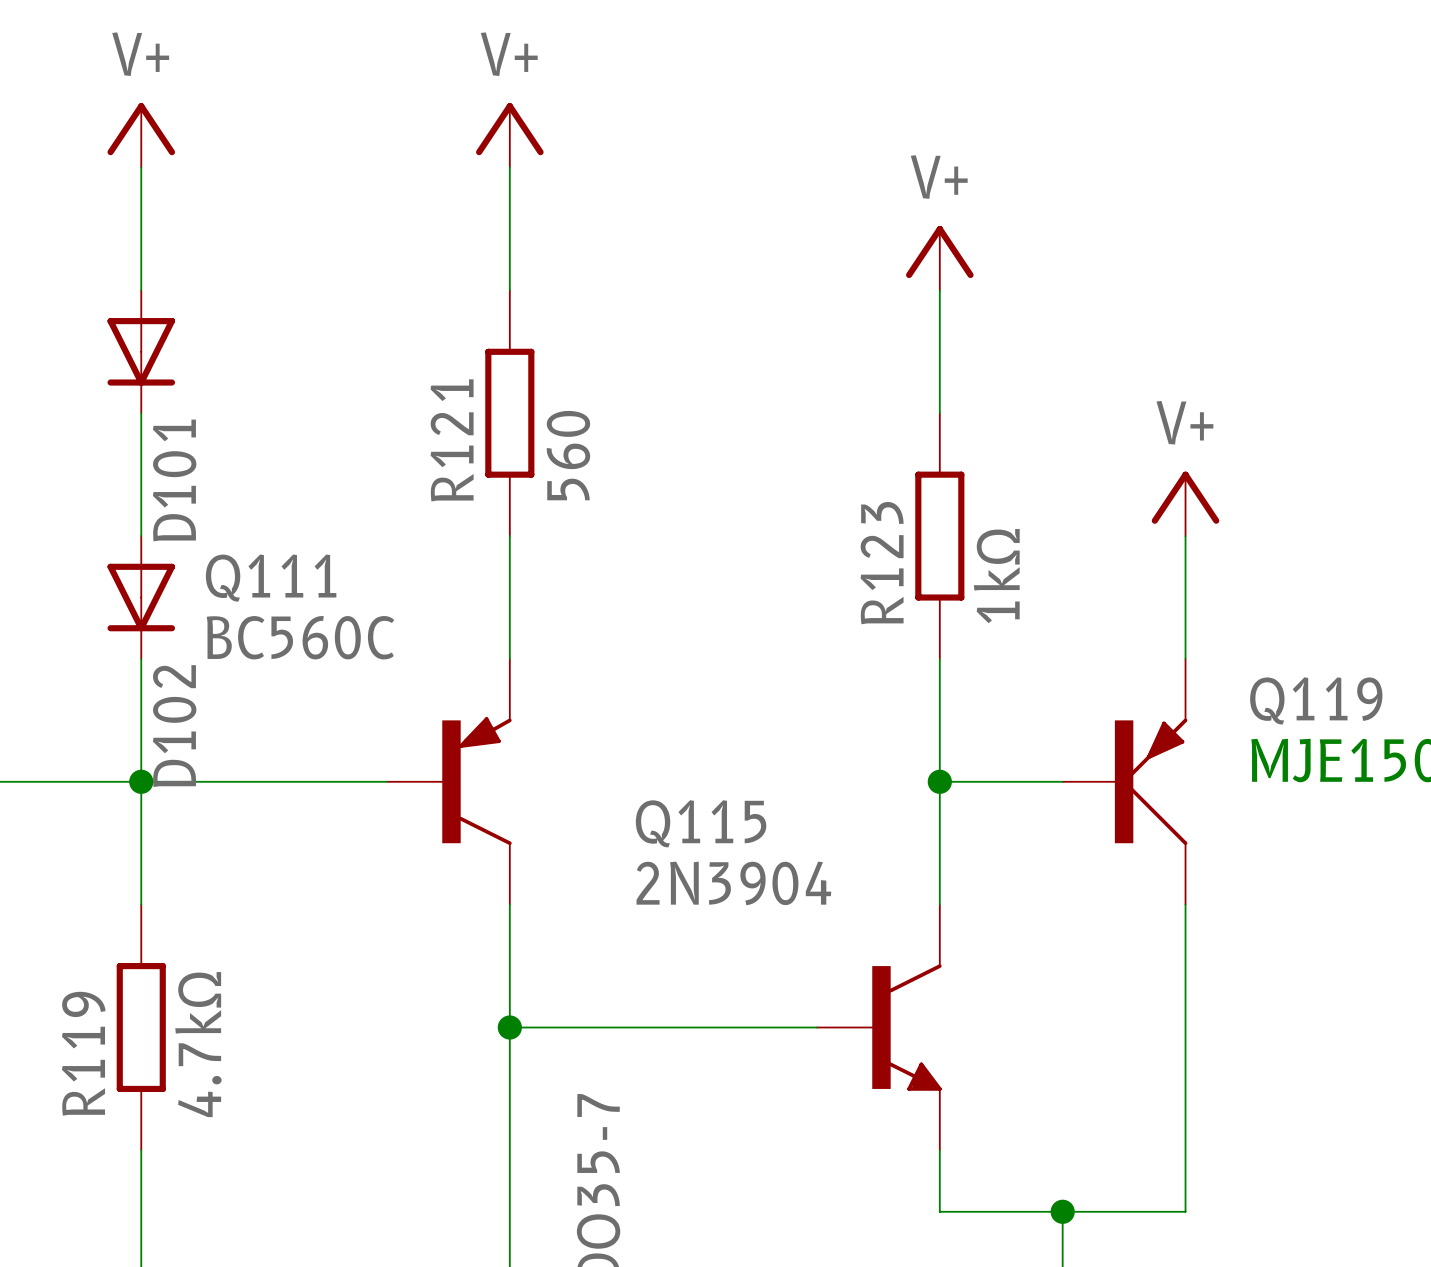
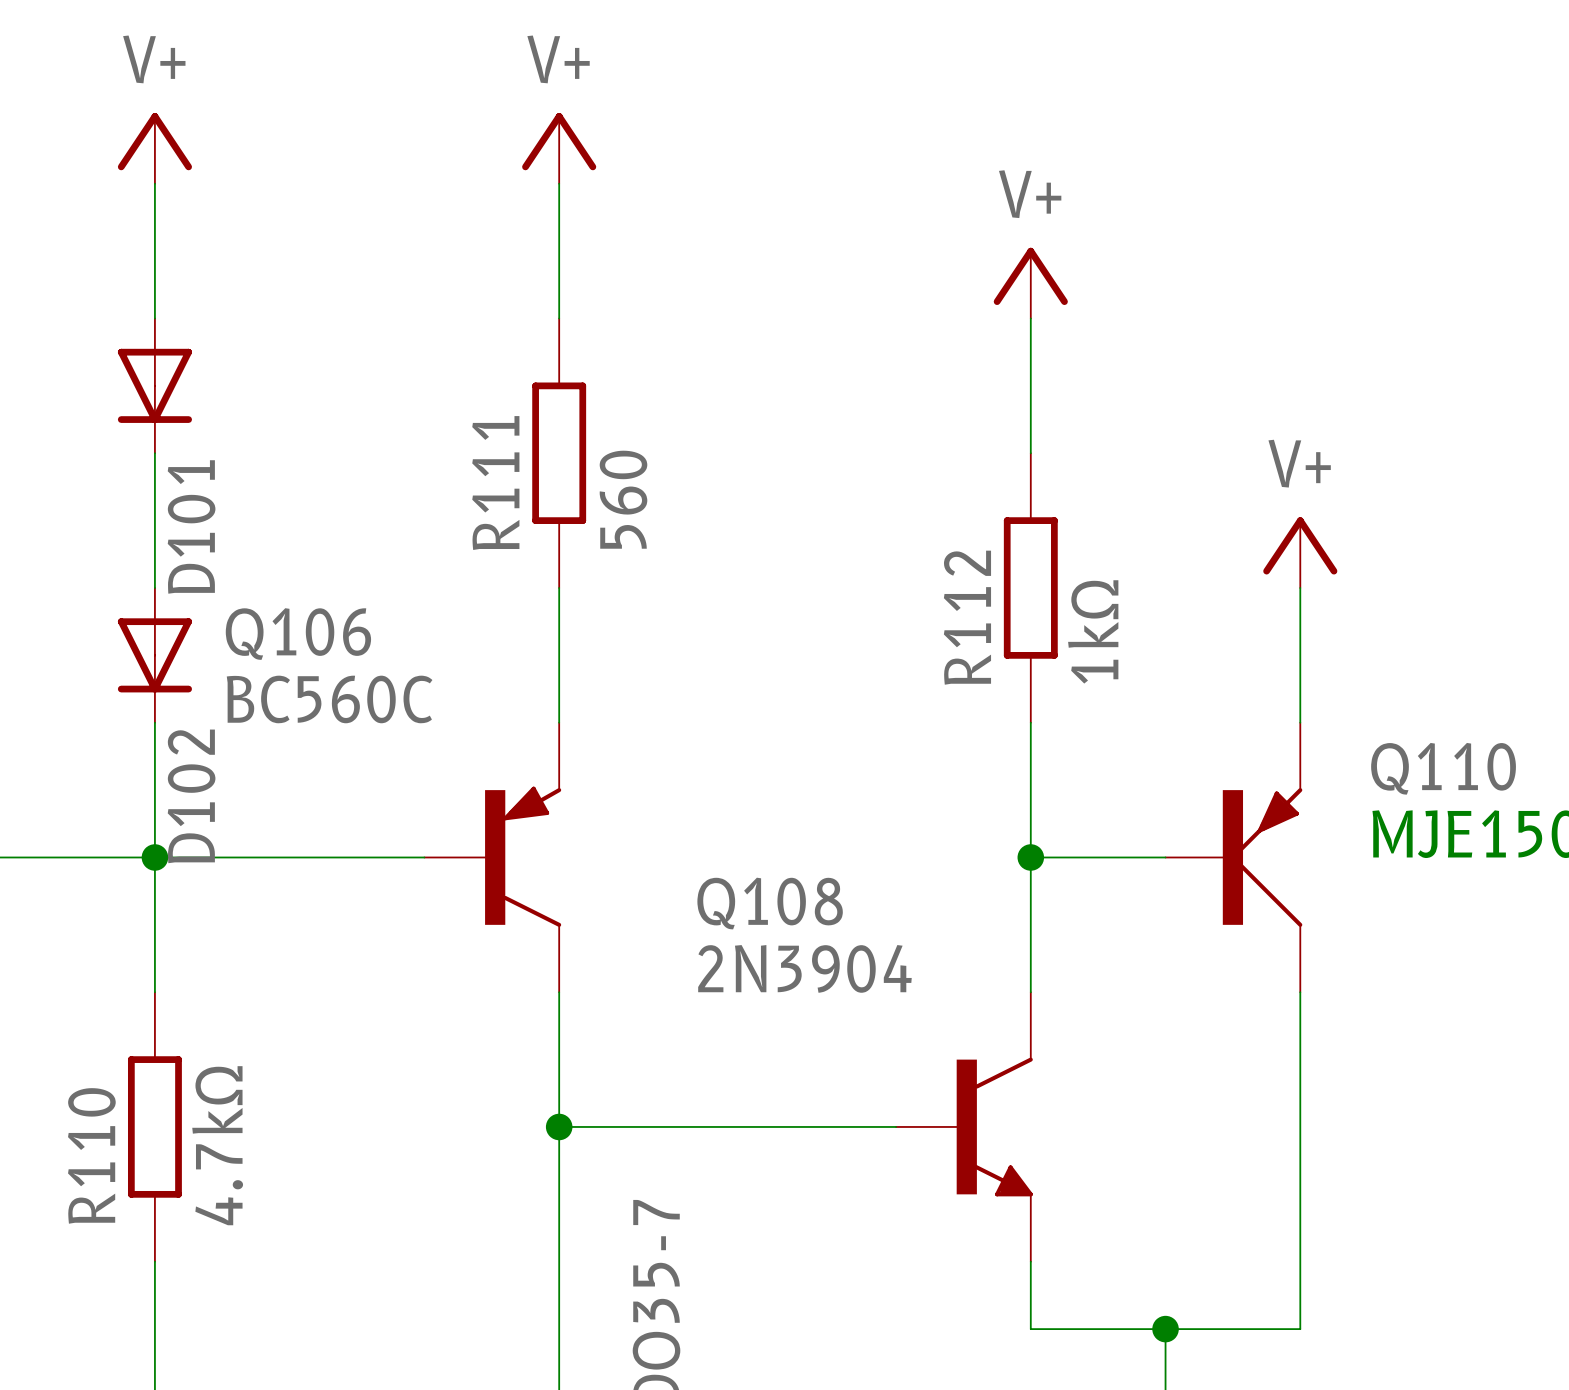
R121 name: R121 (452, 440) -> R111 (495, 483)
R123 name: R123 (882, 563) -> R112 (967, 617)
Q111 name: Q111 (271, 578) -> Q106 (298, 634)
Q119 name: Q119 (1316, 700) -> Q110 (1443, 768)
Q115 name: Q115 (701, 823) -> Q108 (770, 903)
R119 name: R119 (83, 1053) -> R110 (91, 1155)

